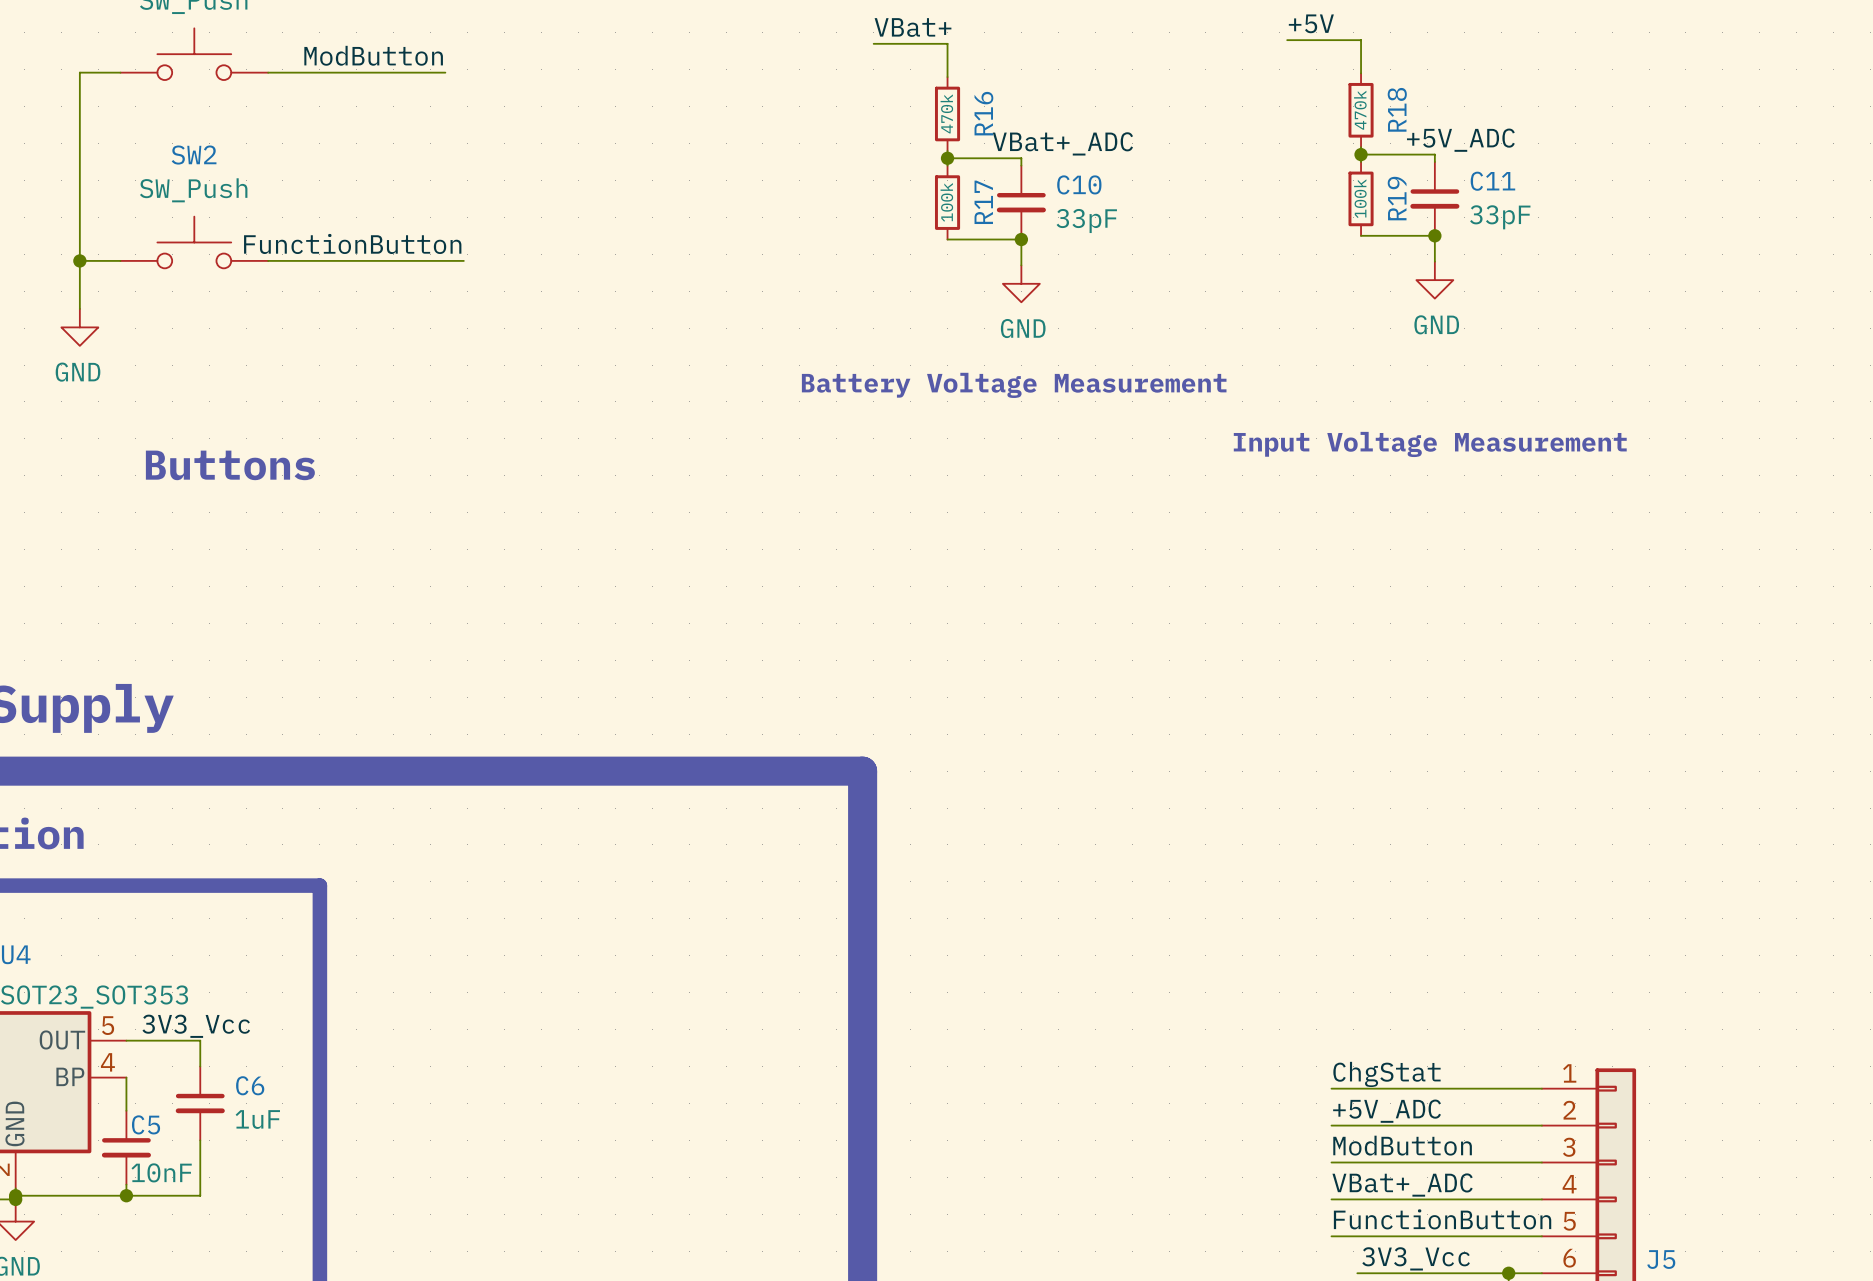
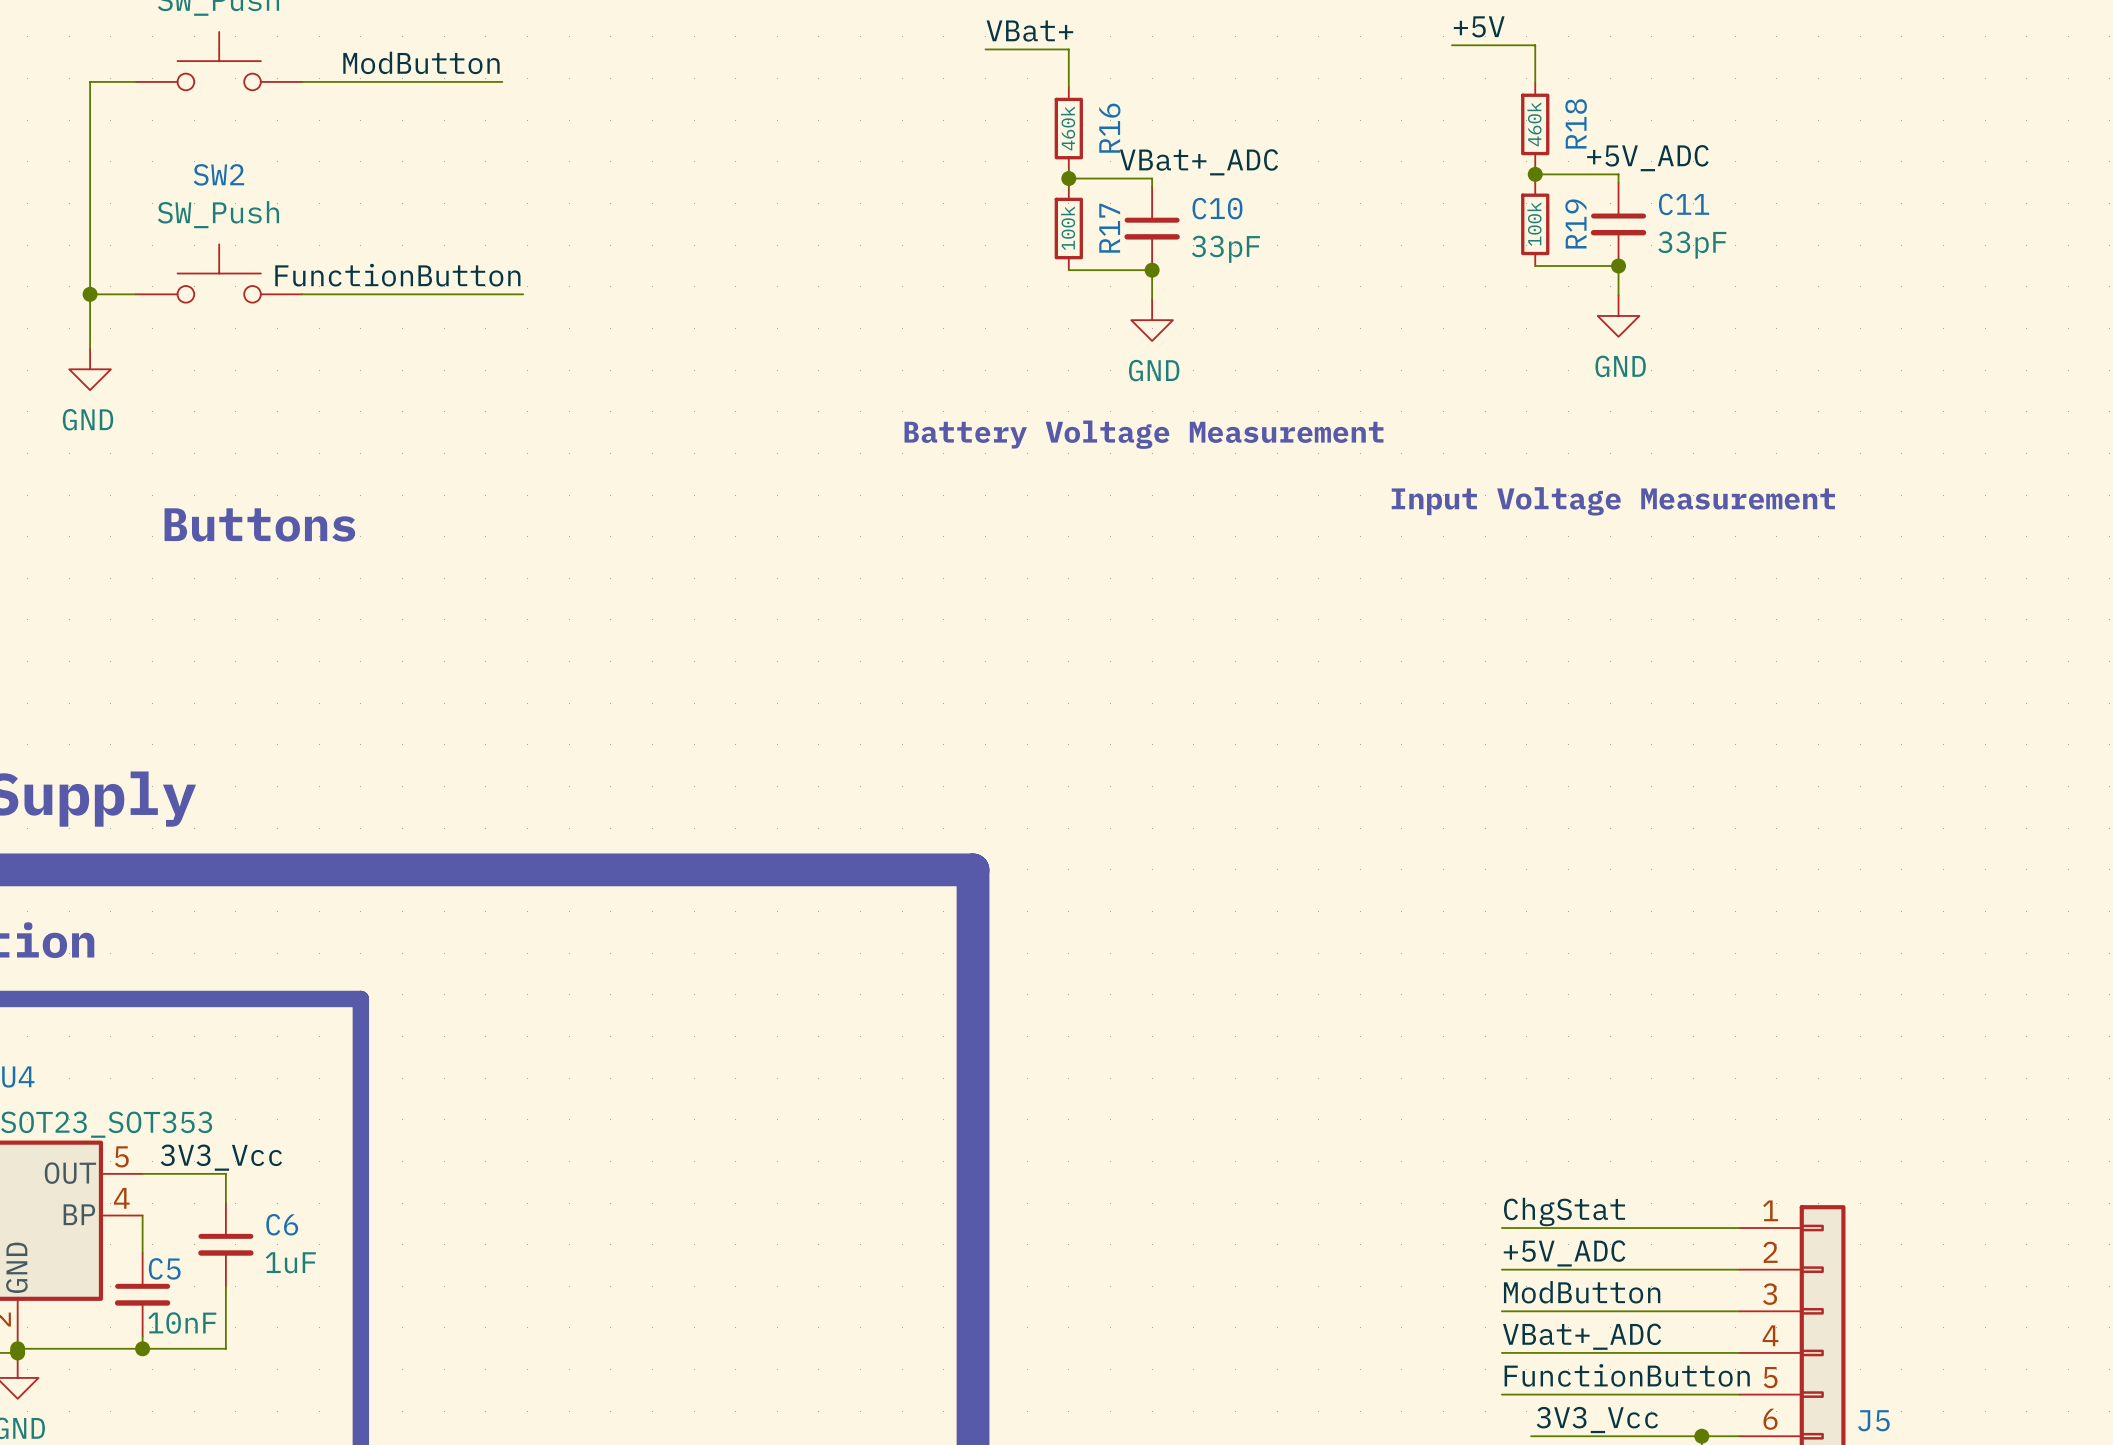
R18 value: 470k (1360, 110) -> 460k (1534, 124)
R16 value: 470k (946, 113) -> 460k (1068, 128)

